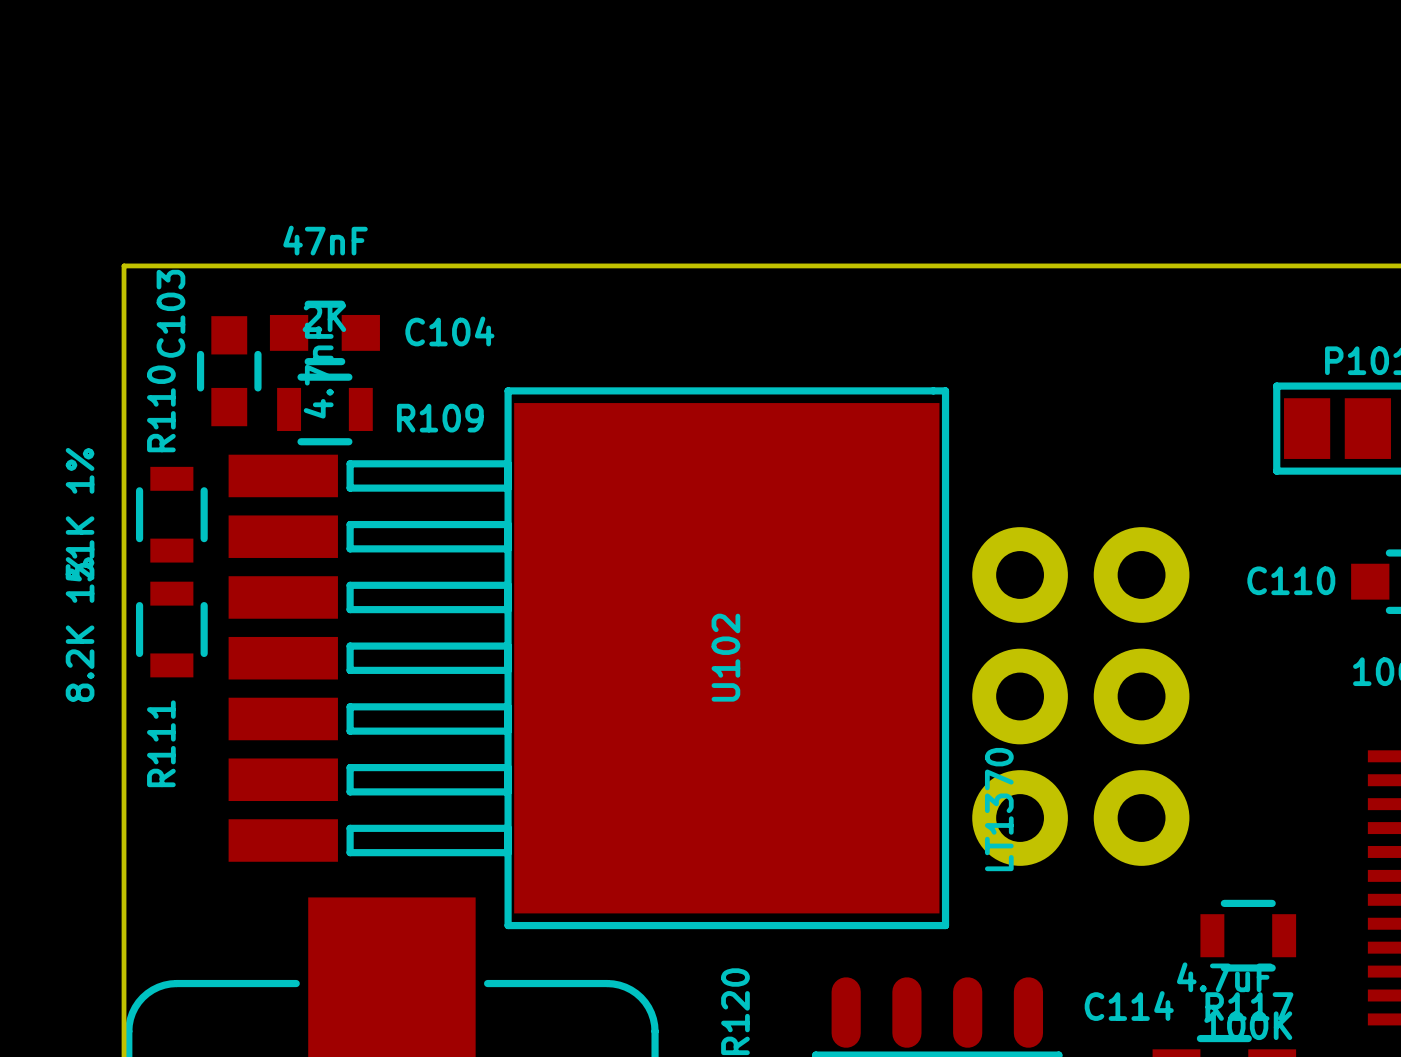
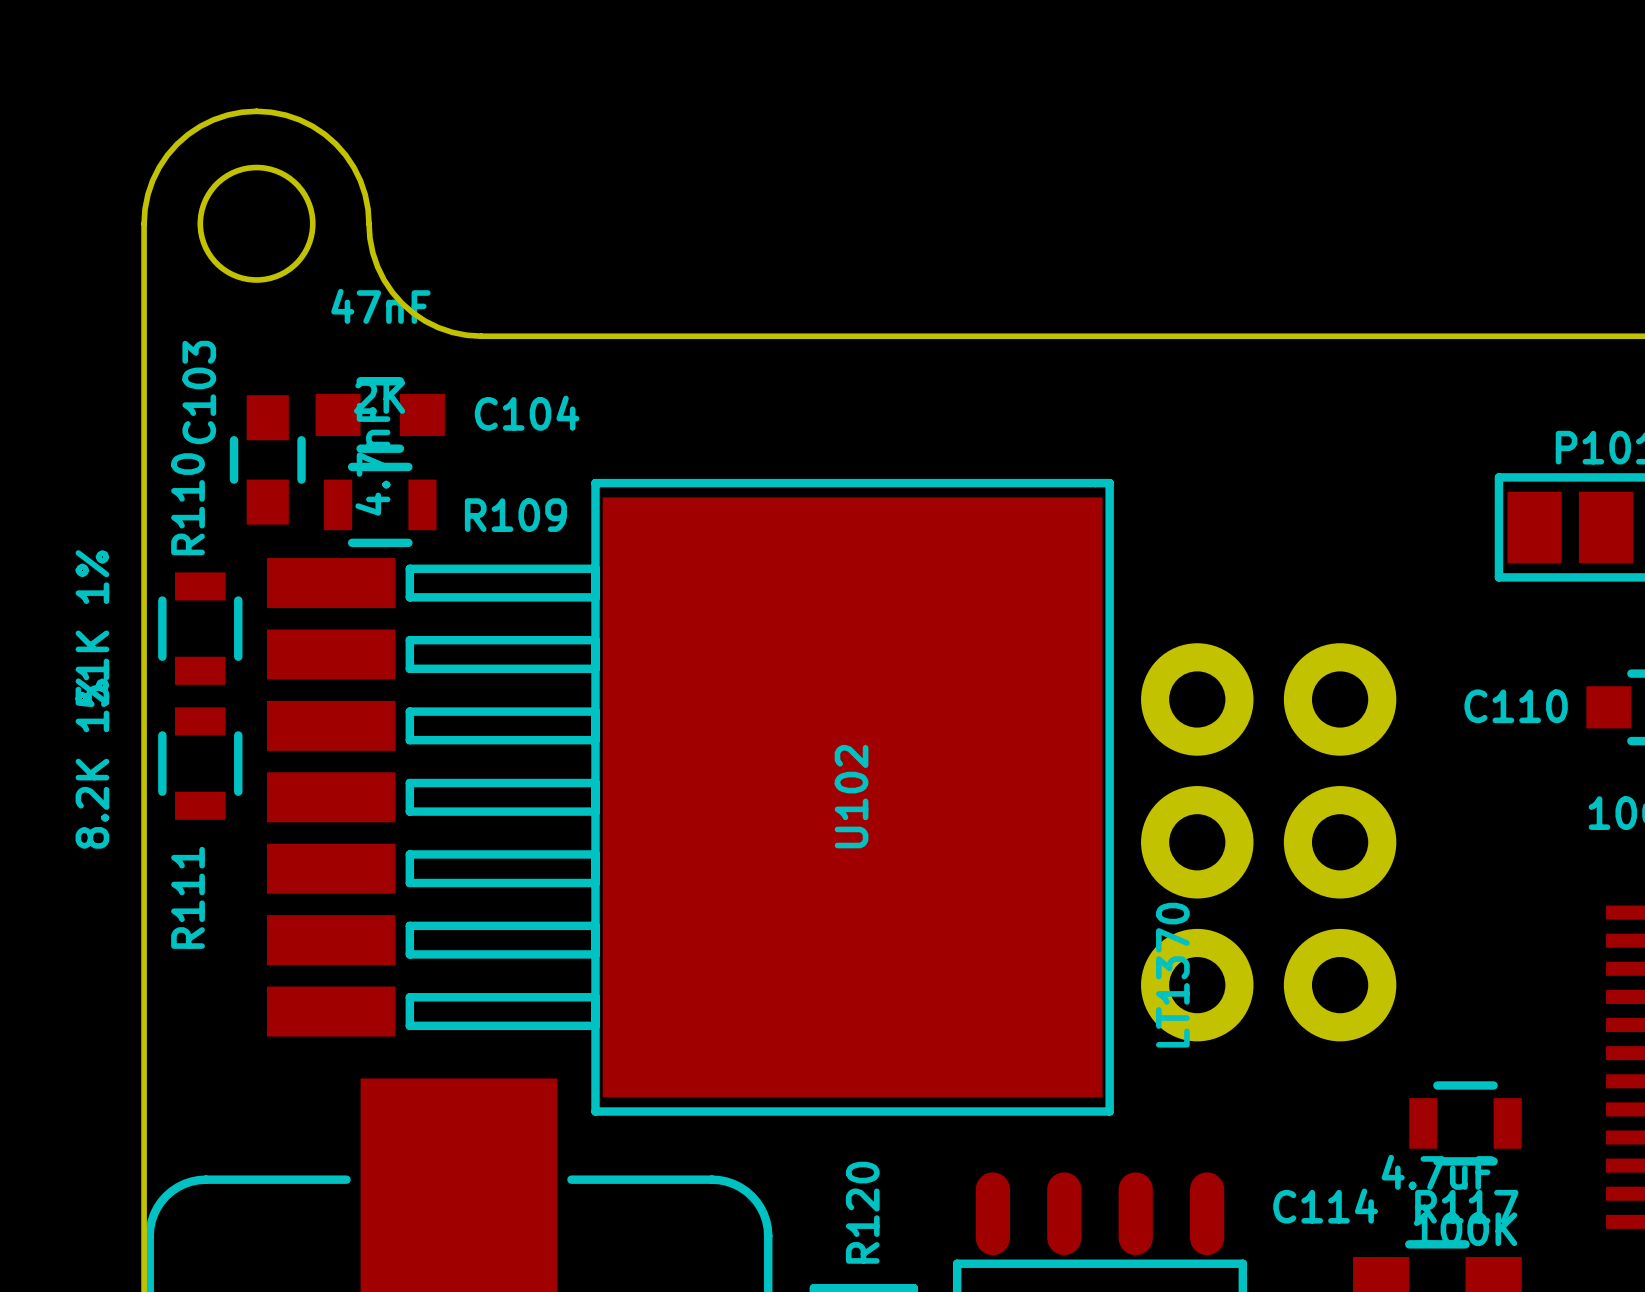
round board edge: none -> [197, 164, 316, 283]
board edge: (124, 265) (411, 265) -> (144, 336) (145, 209) (152, 180) (159, 167) (177, 144) (200, 126) (227, 115) (256, 111) (285, 115) (299, 119) (312, 126) (336, 144) (353, 167) (360, 180) (368, 209) (372, 252) (384, 279) (392, 292) (413, 312) (438, 327) (466, 335) (481, 336)

